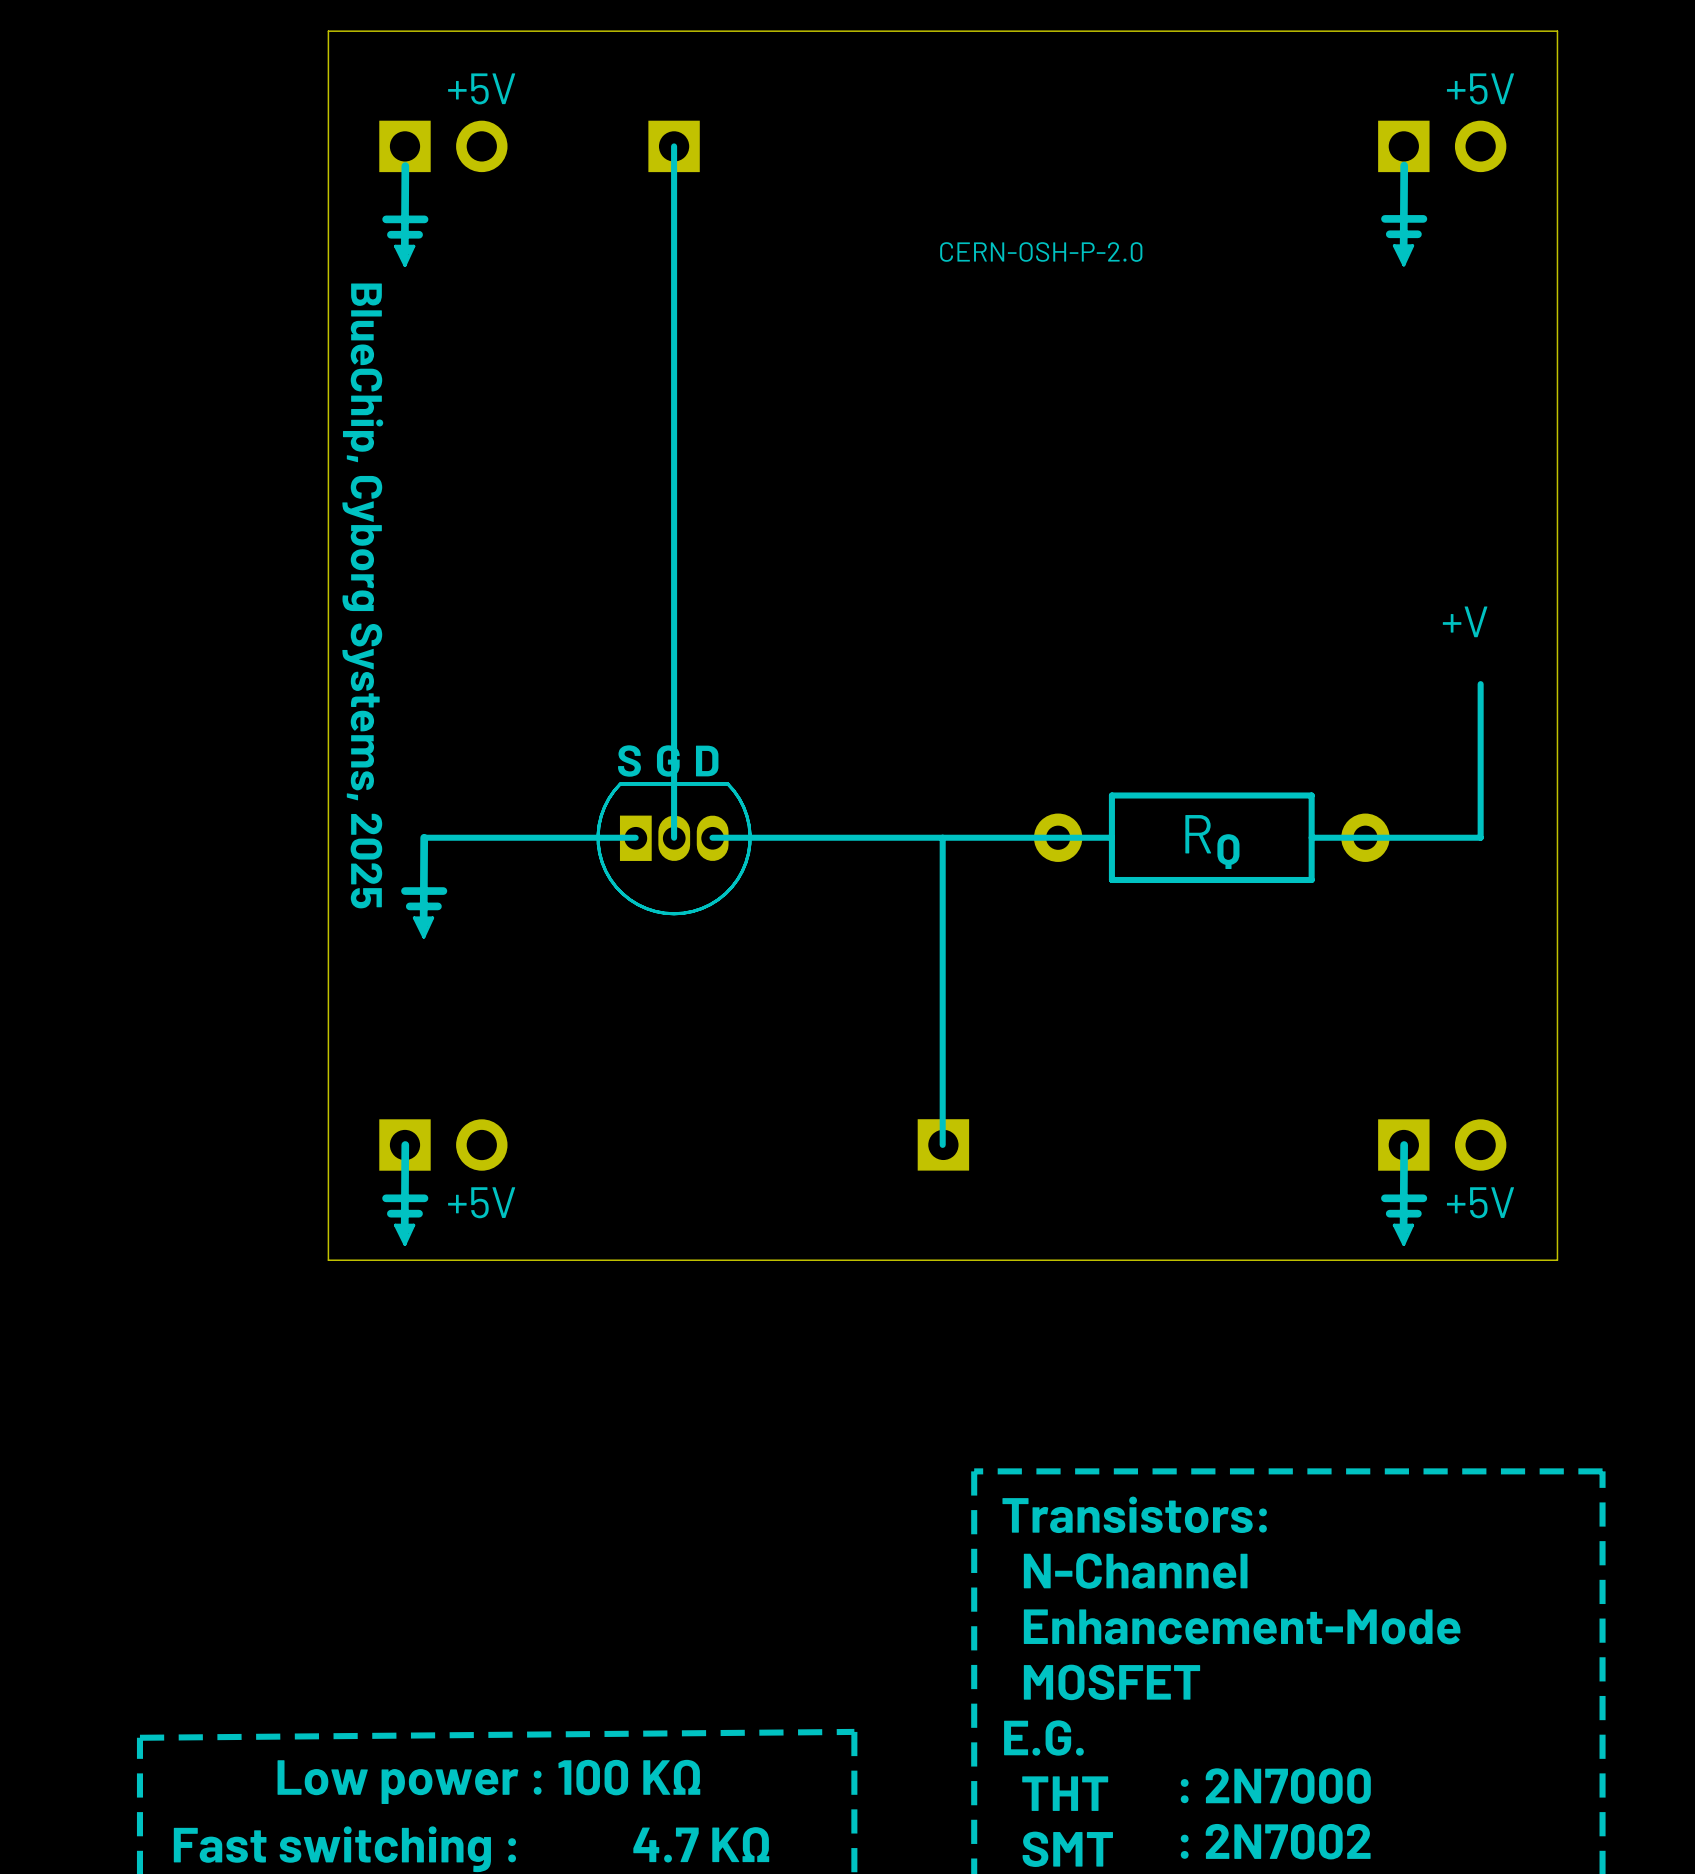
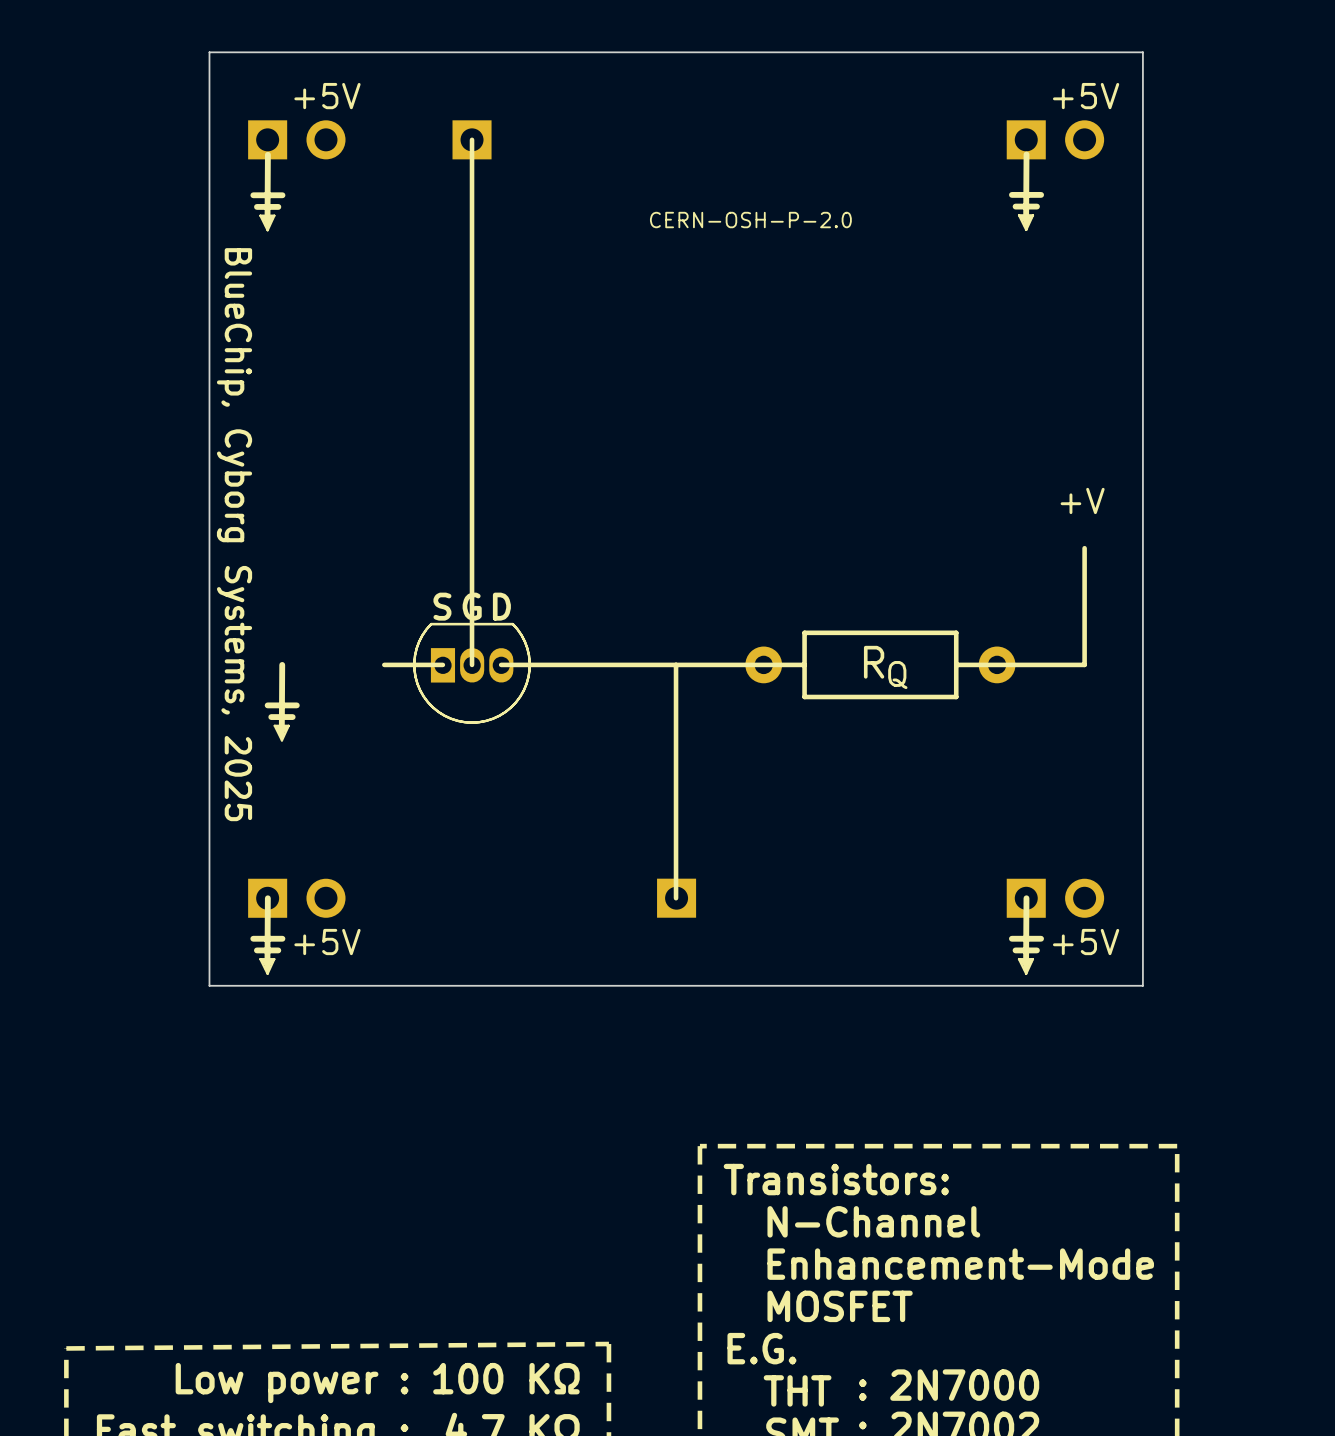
line: (558, 837) (424, 837) -> none

